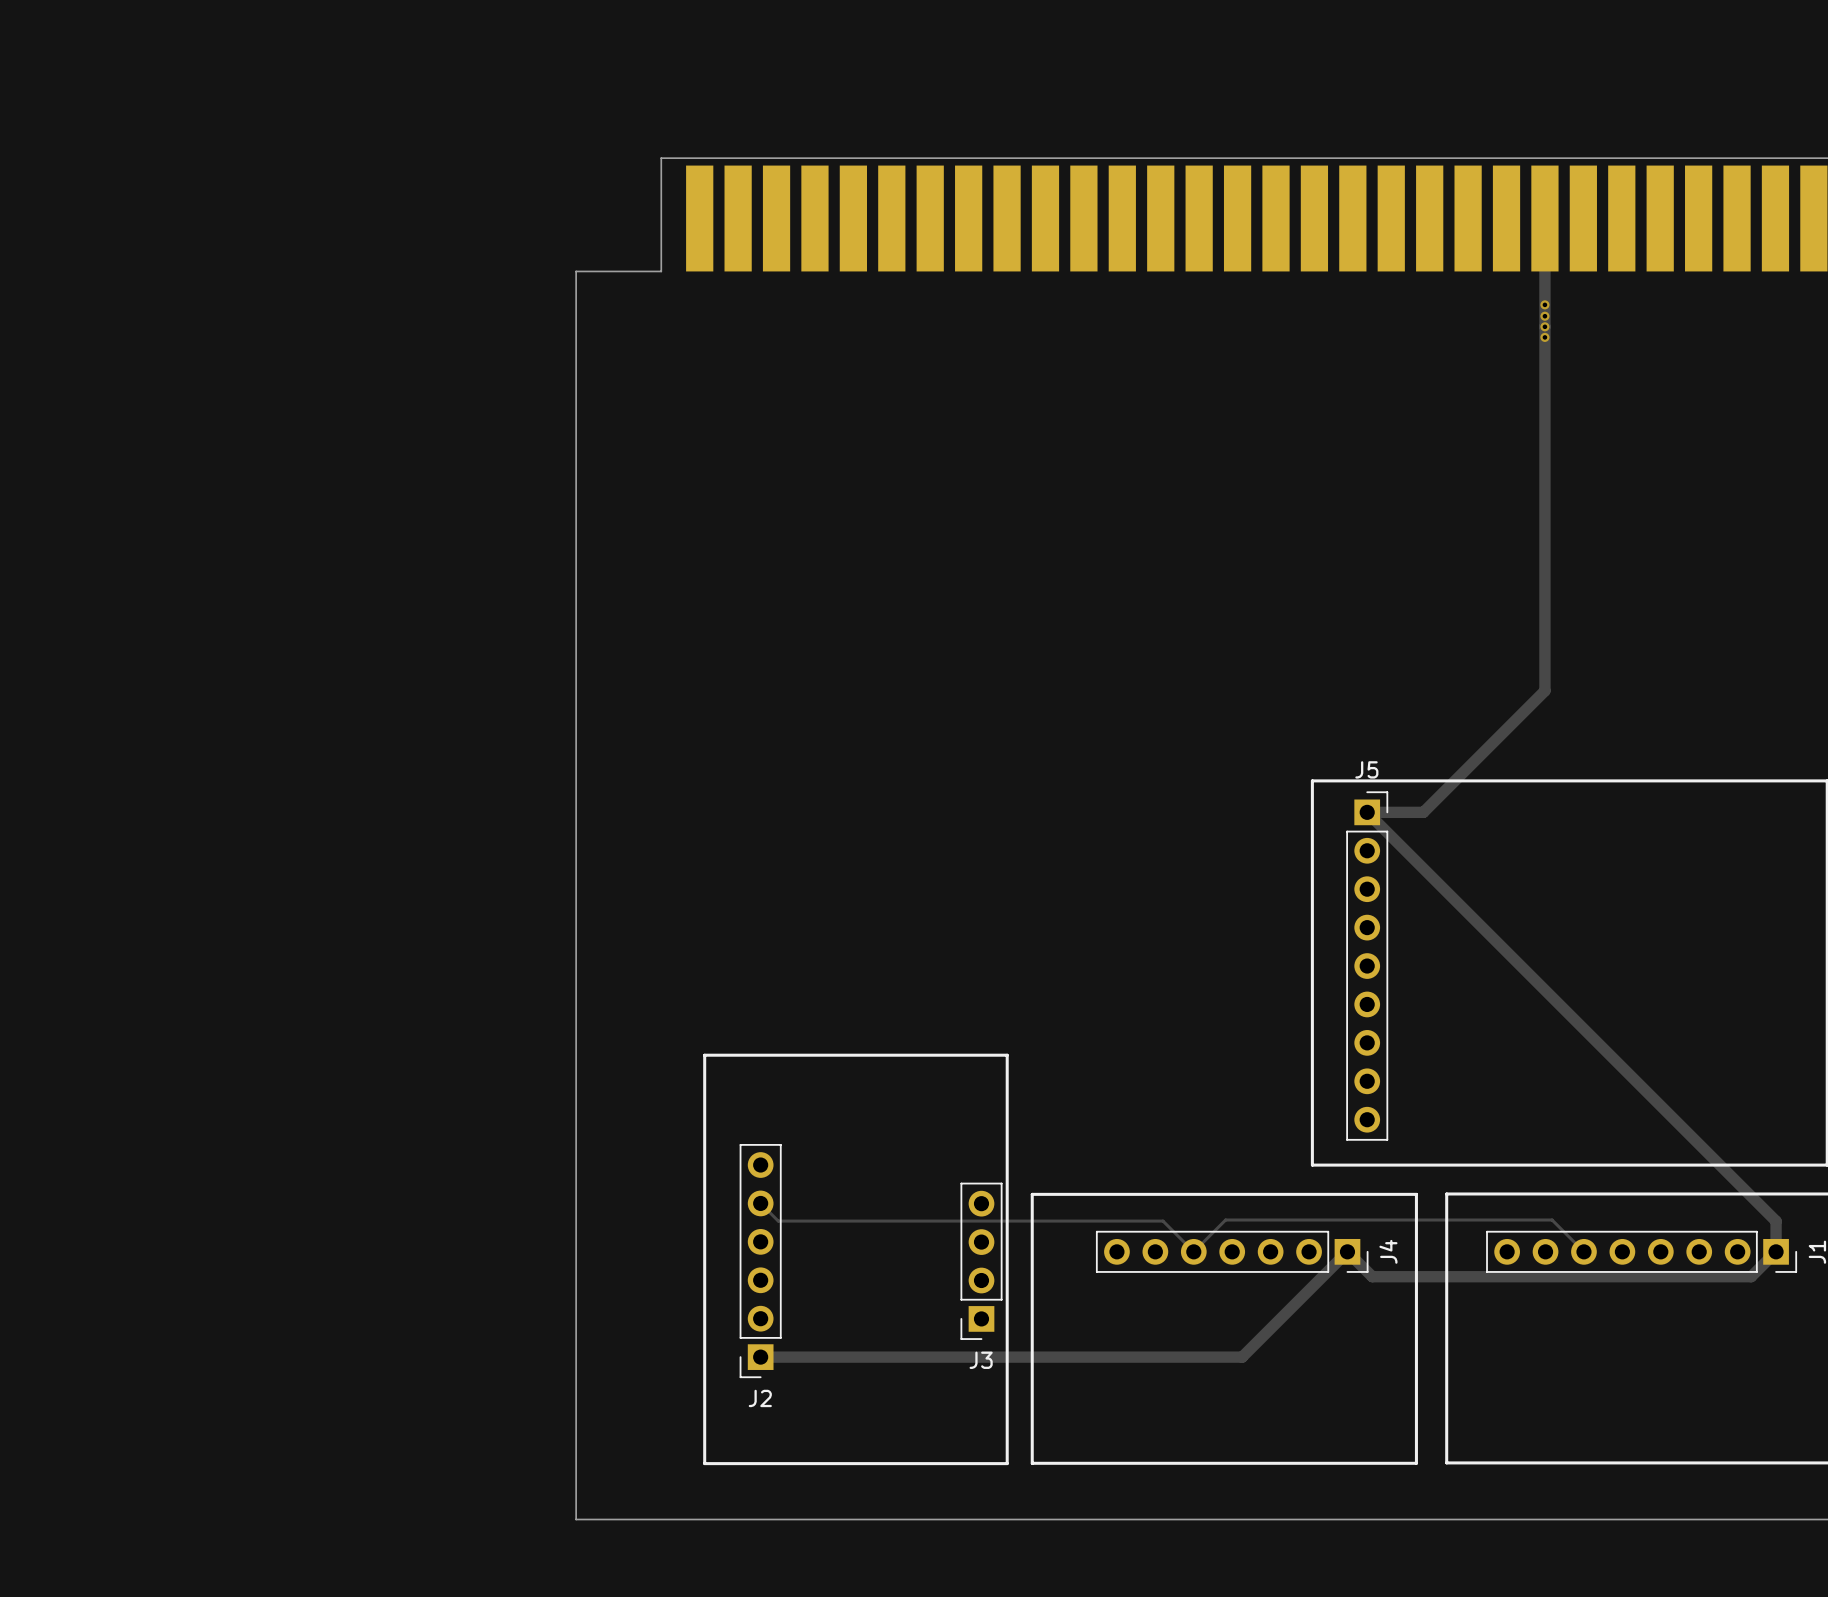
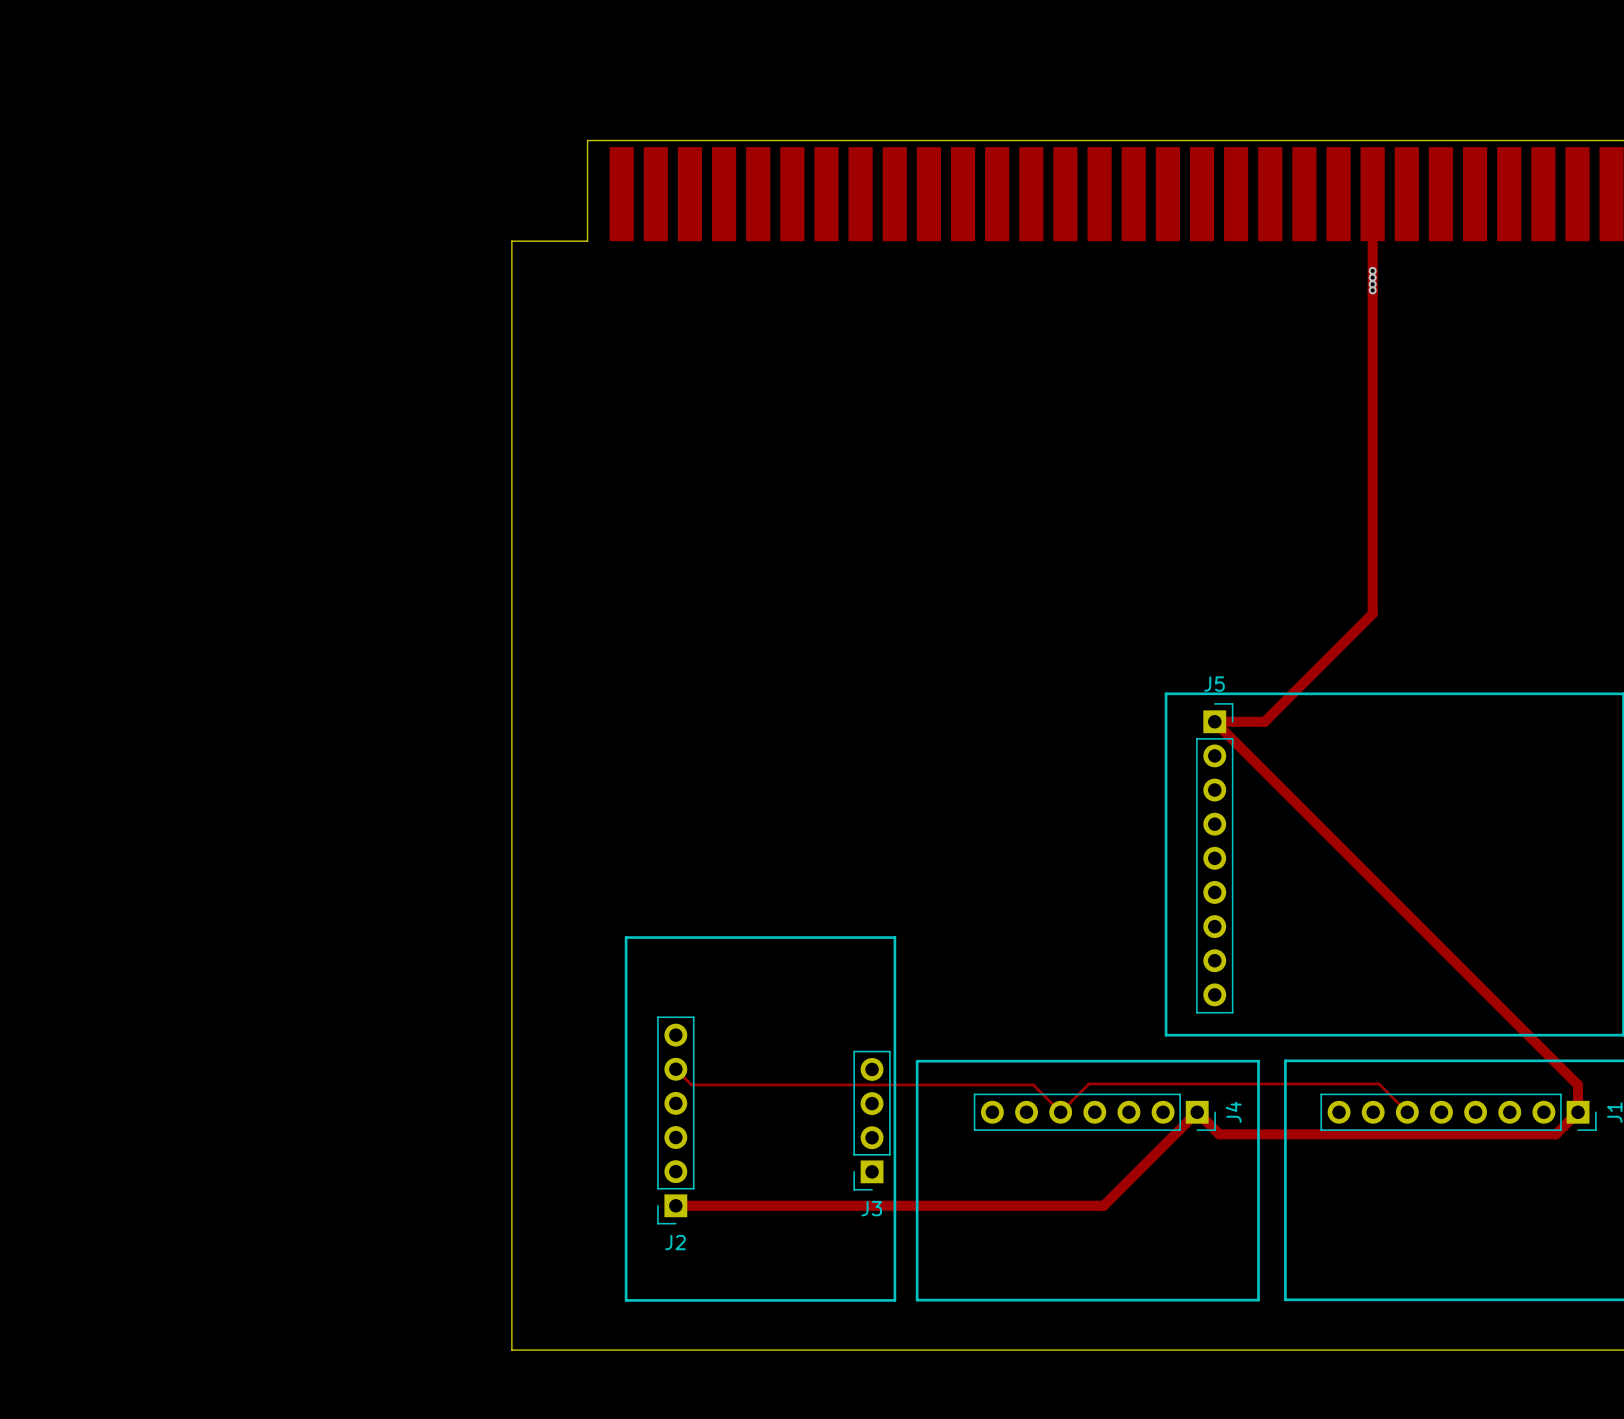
via: none -> (1372, 277)
via: (1544, 316) -> none
via: none -> (1372, 284)
via: (1544, 337) -> none

